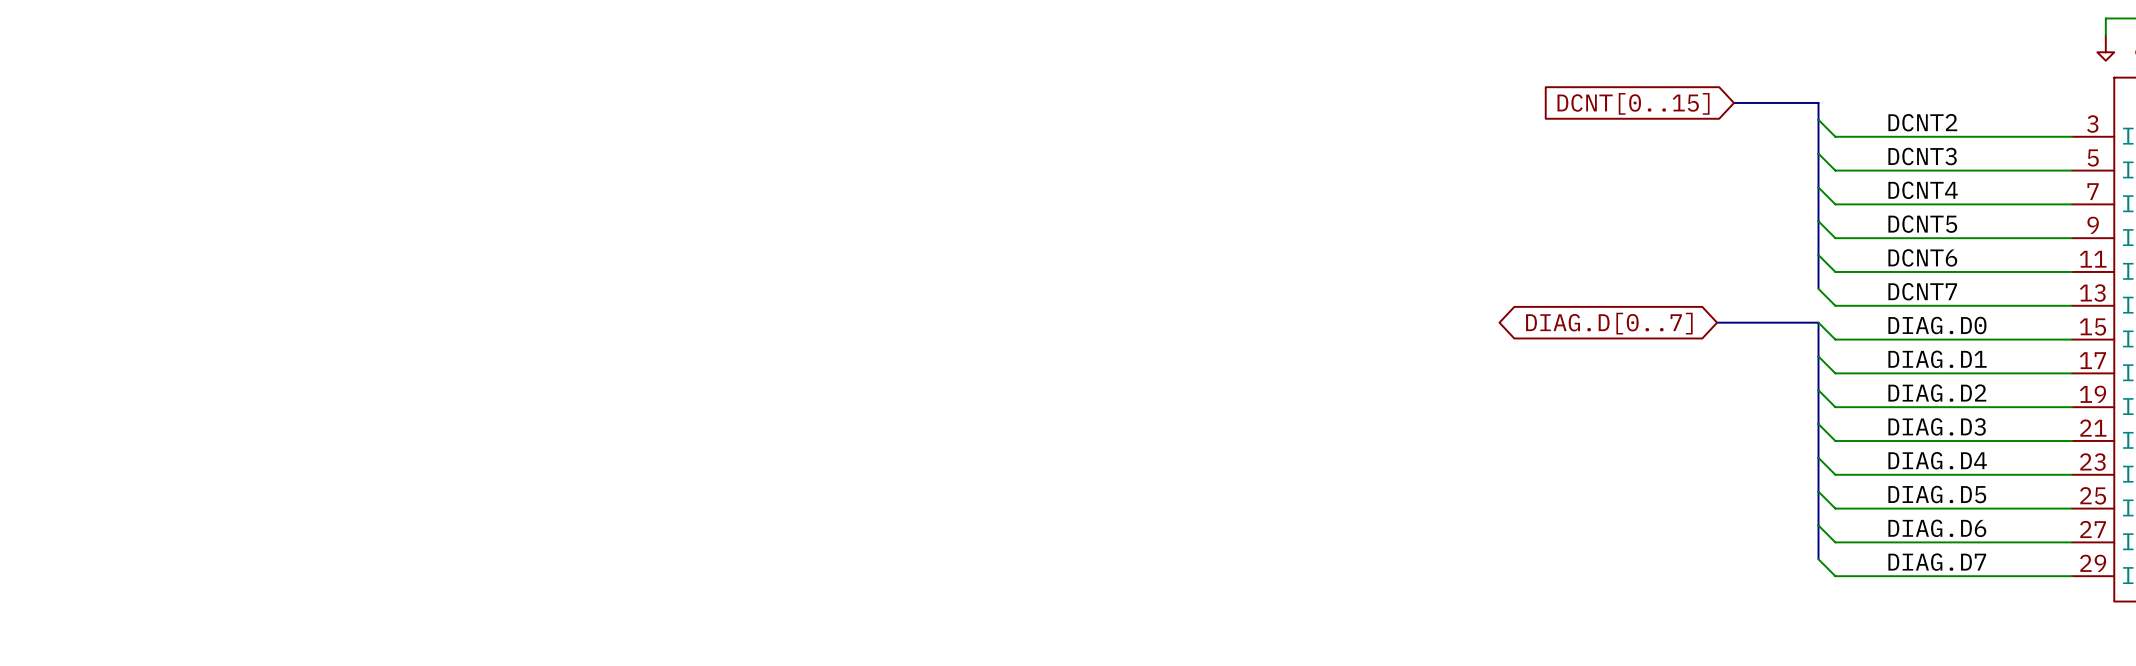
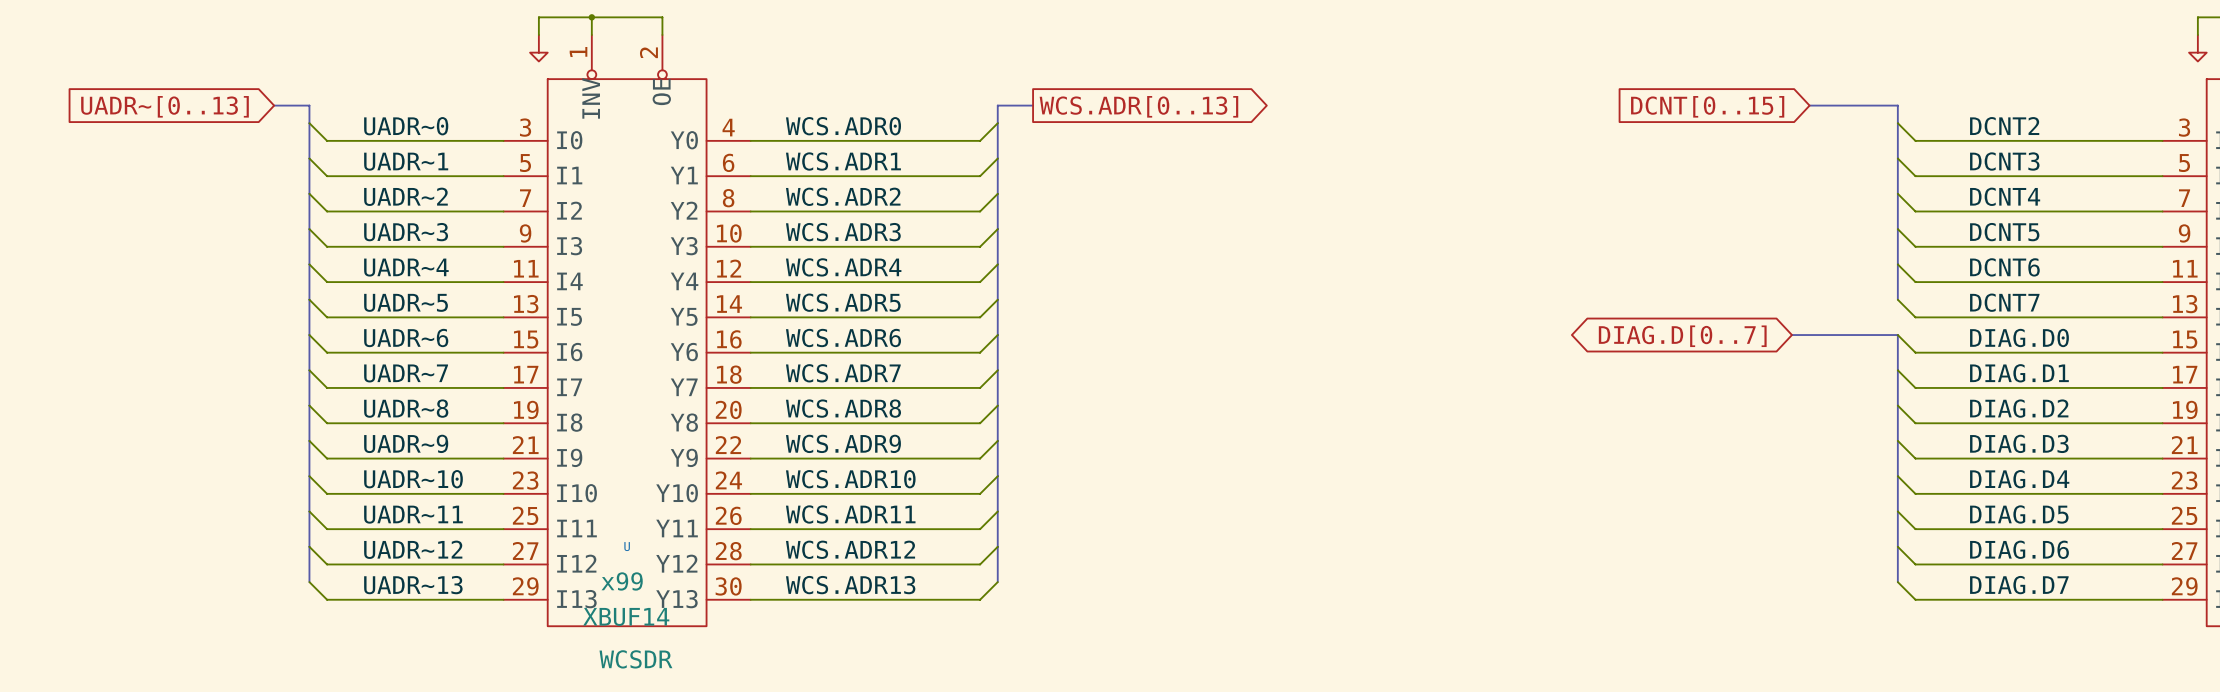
wire: none -> (591, 17) (591, 34)
junction: none -> (591, 17)
wire: none -> (538, 34) (538, 17) (662, 17) (662, 34)
power symbol: none -> (538, 48)
bus: none -> (274, 105) (309, 105) (309, 582)
bus: none -> (1033, 105) (997, 105) (997, 582)
global label: none -> UADR~[0..13] (164, 106)
global label: none -> WCS.ADR[0..13] (1138, 106)
wire: none -> (309, 123) (327, 140) (503, 140)
wire: none -> (997, 123) (980, 140) (750, 140)
label: none -> UADR~0 (406, 126)
label: none -> WCS.ADR0 (843, 126)
wire: none -> (309, 158) (327, 176) (503, 176)
wire: none -> (997, 158) (980, 176) (750, 176)
label: none -> UADR~1 (406, 161)
label: none -> WCS.ADR1 (843, 161)
wire: none -> (309, 193) (327, 211) (503, 211)
wire: none -> (997, 193) (980, 211) (750, 211)
label: none -> UADR~2 (405, 196)
label: none -> WCS.ADR2 (843, 196)
wire: none -> (309, 229) (327, 246) (503, 246)
wire: none -> (997, 229) (980, 246) (750, 246)
label: none -> UADR~3 (406, 232)
label: none -> WCS.ADR3 (843, 232)
wire: none -> (309, 264) (327, 282) (503, 282)
wire: none -> (997, 264) (980, 282) (750, 282)
label: none -> WCS.ADR4 (843, 267)
label: none -> UADR~4 (406, 267)
wire: none -> (309, 299) (327, 317) (503, 317)
wire: none -> (997, 299) (980, 317) (750, 317)
label: none -> UADR~5 (406, 302)
label: none -> WCS.ADR5 (843, 302)
U: none -> XBUF14 (627, 330)
wire: none -> (309, 335) (327, 352) (503, 352)
wire: none -> (997, 335) (980, 352) (750, 352)
label: none -> UADR~6 (406, 337)
label: none -> WCS.ADR6 (843, 337)
wire: none -> (309, 370) (327, 387) (503, 387)
wire: none -> (997, 370) (980, 387) (750, 387)
label: none -> UADR~7 (406, 373)
label: none -> WCS.ADR7 (843, 373)
wire: none -> (309, 405) (327, 423) (503, 423)
wire: none -> (997, 405) (980, 423) (750, 423)
label: none -> UADR~8 (406, 408)
label: none -> WCS.ADR8 (843, 408)
wire: none -> (309, 440) (327, 458) (503, 458)
wire: none -> (997, 440) (980, 458) (750, 458)
label: none -> UADR~9 (406, 443)
label: none -> WCS.ADR9 (843, 443)
wire: none -> (309, 476) (327, 493) (503, 493)
wire: none -> (997, 476) (980, 493) (750, 493)
label: none -> UADR~10 (413, 479)
label: none -> WCS.ADR10 (850, 479)
wire: none -> (309, 511) (327, 529) (503, 529)
wire: none -> (997, 511) (980, 529) (750, 529)
label: none -> UADR~11 (413, 514)
label: none -> WCS.ADR11 (850, 514)
wire: none -> (309, 546) (327, 564) (503, 564)
wire: none -> (997, 546) (980, 564) (750, 564)
label: none -> UADR~12 (413, 549)
label: none -> WCS.ADR12 (850, 549)
wire: none -> (309, 582) (327, 599) (503, 599)
wire: none -> (997, 582) (980, 599) (750, 599)
label: none -> UADR~13 (413, 585)
label: none -> WCS.ADR13 (850, 585)

